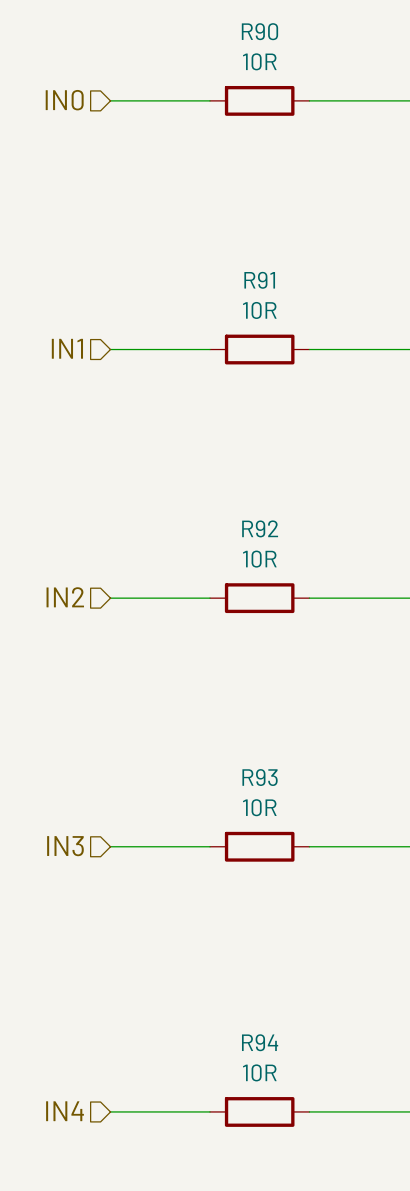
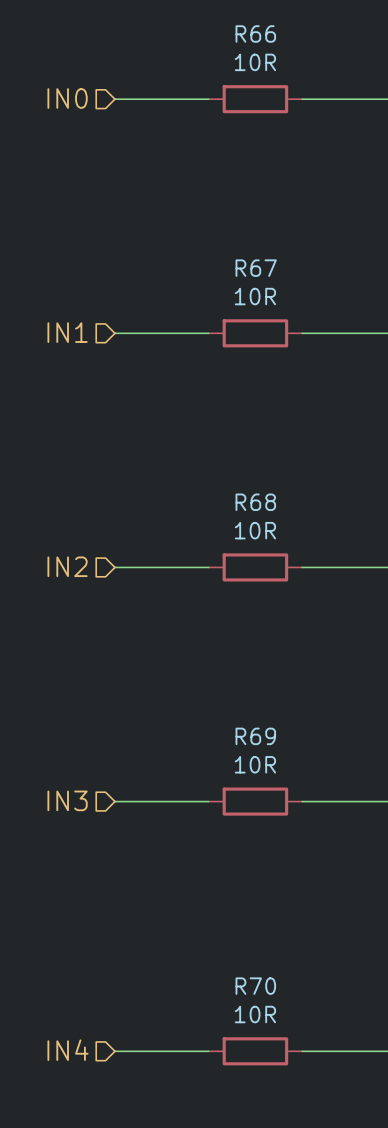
R90 name: R90 (259, 31) -> R66 (255, 33)
R91 name: R91 (259, 280) -> R67 (256, 268)
R92 name: R92 (260, 528) -> R68 (255, 502)
R93 name: R93 (260, 777) -> R69 (255, 736)
R94 name: R94 (260, 1042) -> R70 (255, 986)

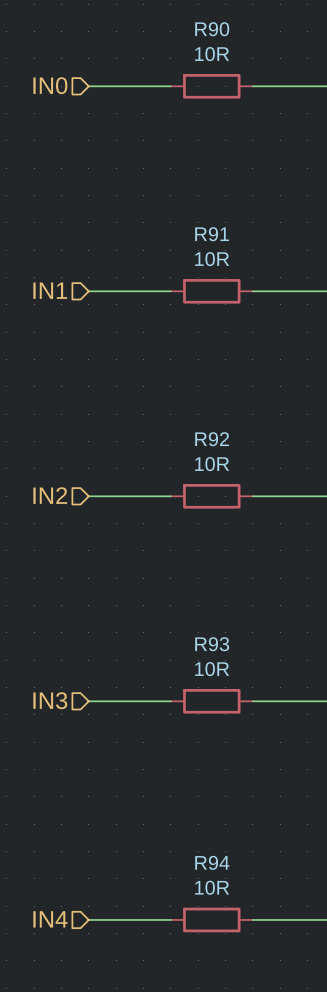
R66 name: R66 (255, 33) -> R90 (212, 29)
R67 name: R67 (256, 268) -> R91 (212, 234)
R68 name: R68 (255, 502) -> R92 (212, 439)
R69 name: R69 (255, 736) -> R93 (212, 644)
R70 name: R70 (255, 986) -> R94 (212, 862)

